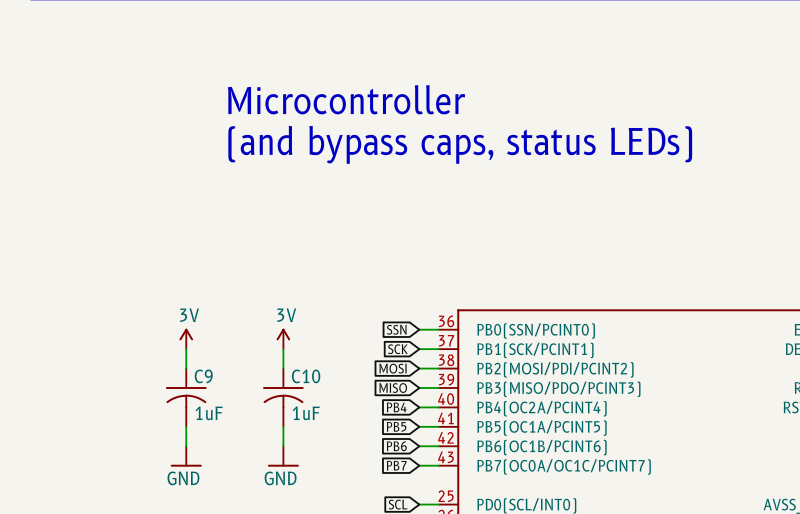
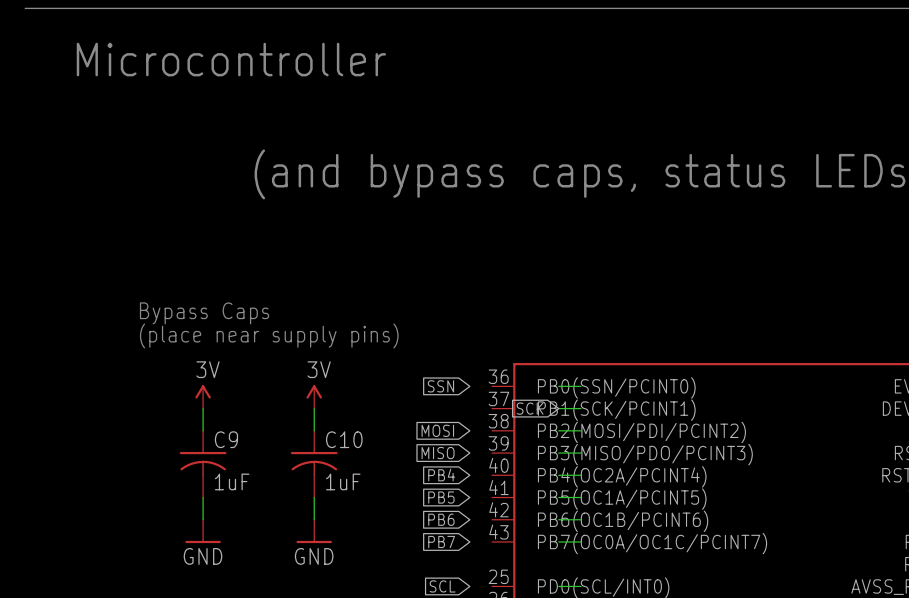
text position: Microcontroller (346, 99) -> Microcontroller (231, 59)
text: none -> Bypass Caps (204, 313)
text: none -> (place near supply pins) (269, 335)
wire: (419, 329) (438, 329) -> (558, 386) (581, 386)
global label position: SCK (397, 349) -> SCK (530, 408)
wire: (419, 349) (438, 349) -> (558, 408) (581, 408)
wire: (419, 368) (438, 368) -> (558, 430) (581, 430)
wire: (419, 387) (438, 387) -> (558, 453) (581, 453)
wire: (419, 407) (438, 407) -> (558, 475) (581, 475)
wire: (419, 426) (438, 426) -> (558, 497) (581, 497)
wire: (419, 446) (438, 446) -> (558, 519) (581, 519)
wire: (419, 465) (438, 465) -> (558, 541) (581, 541)
wire: (419, 504) (438, 504) -> (558, 586) (581, 586)

